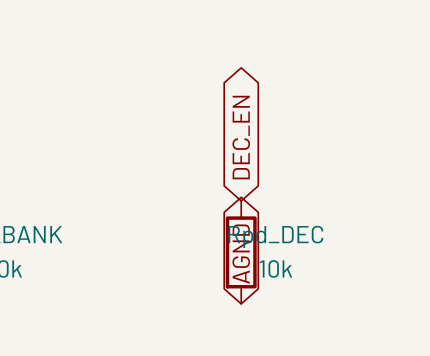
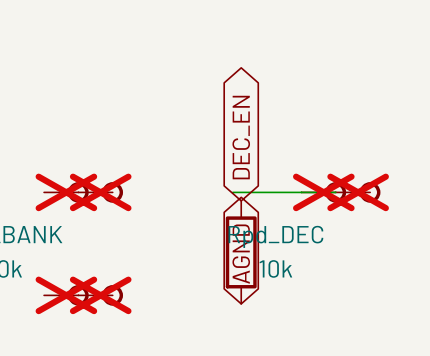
part: none -> (66, 192)
part: none -> (100, 192)
wire: none -> (232, 192) (335, 192)
part: none -> (323, 192)
part: none -> (358, 192)
part: none -> (66, 295)
part: none -> (100, 295)

